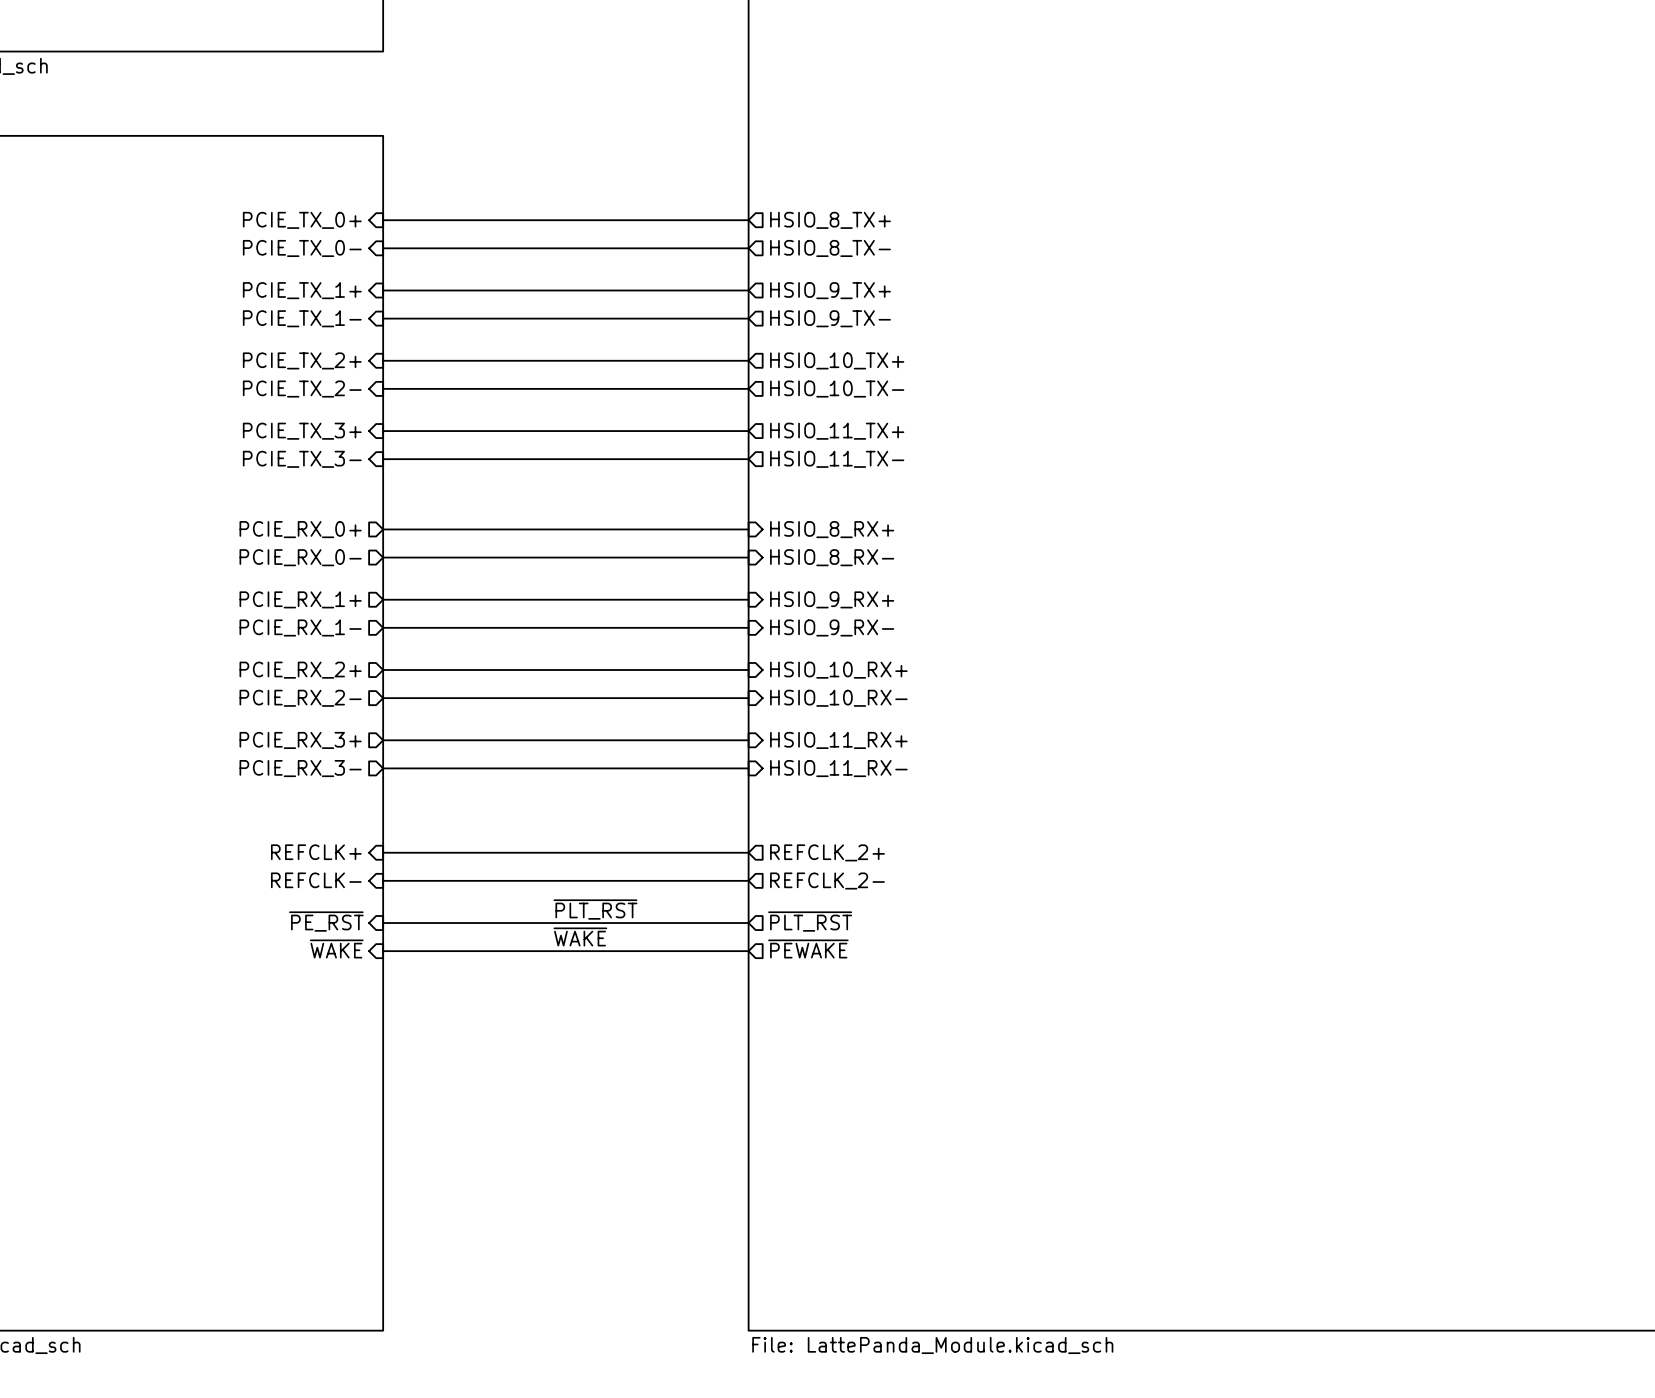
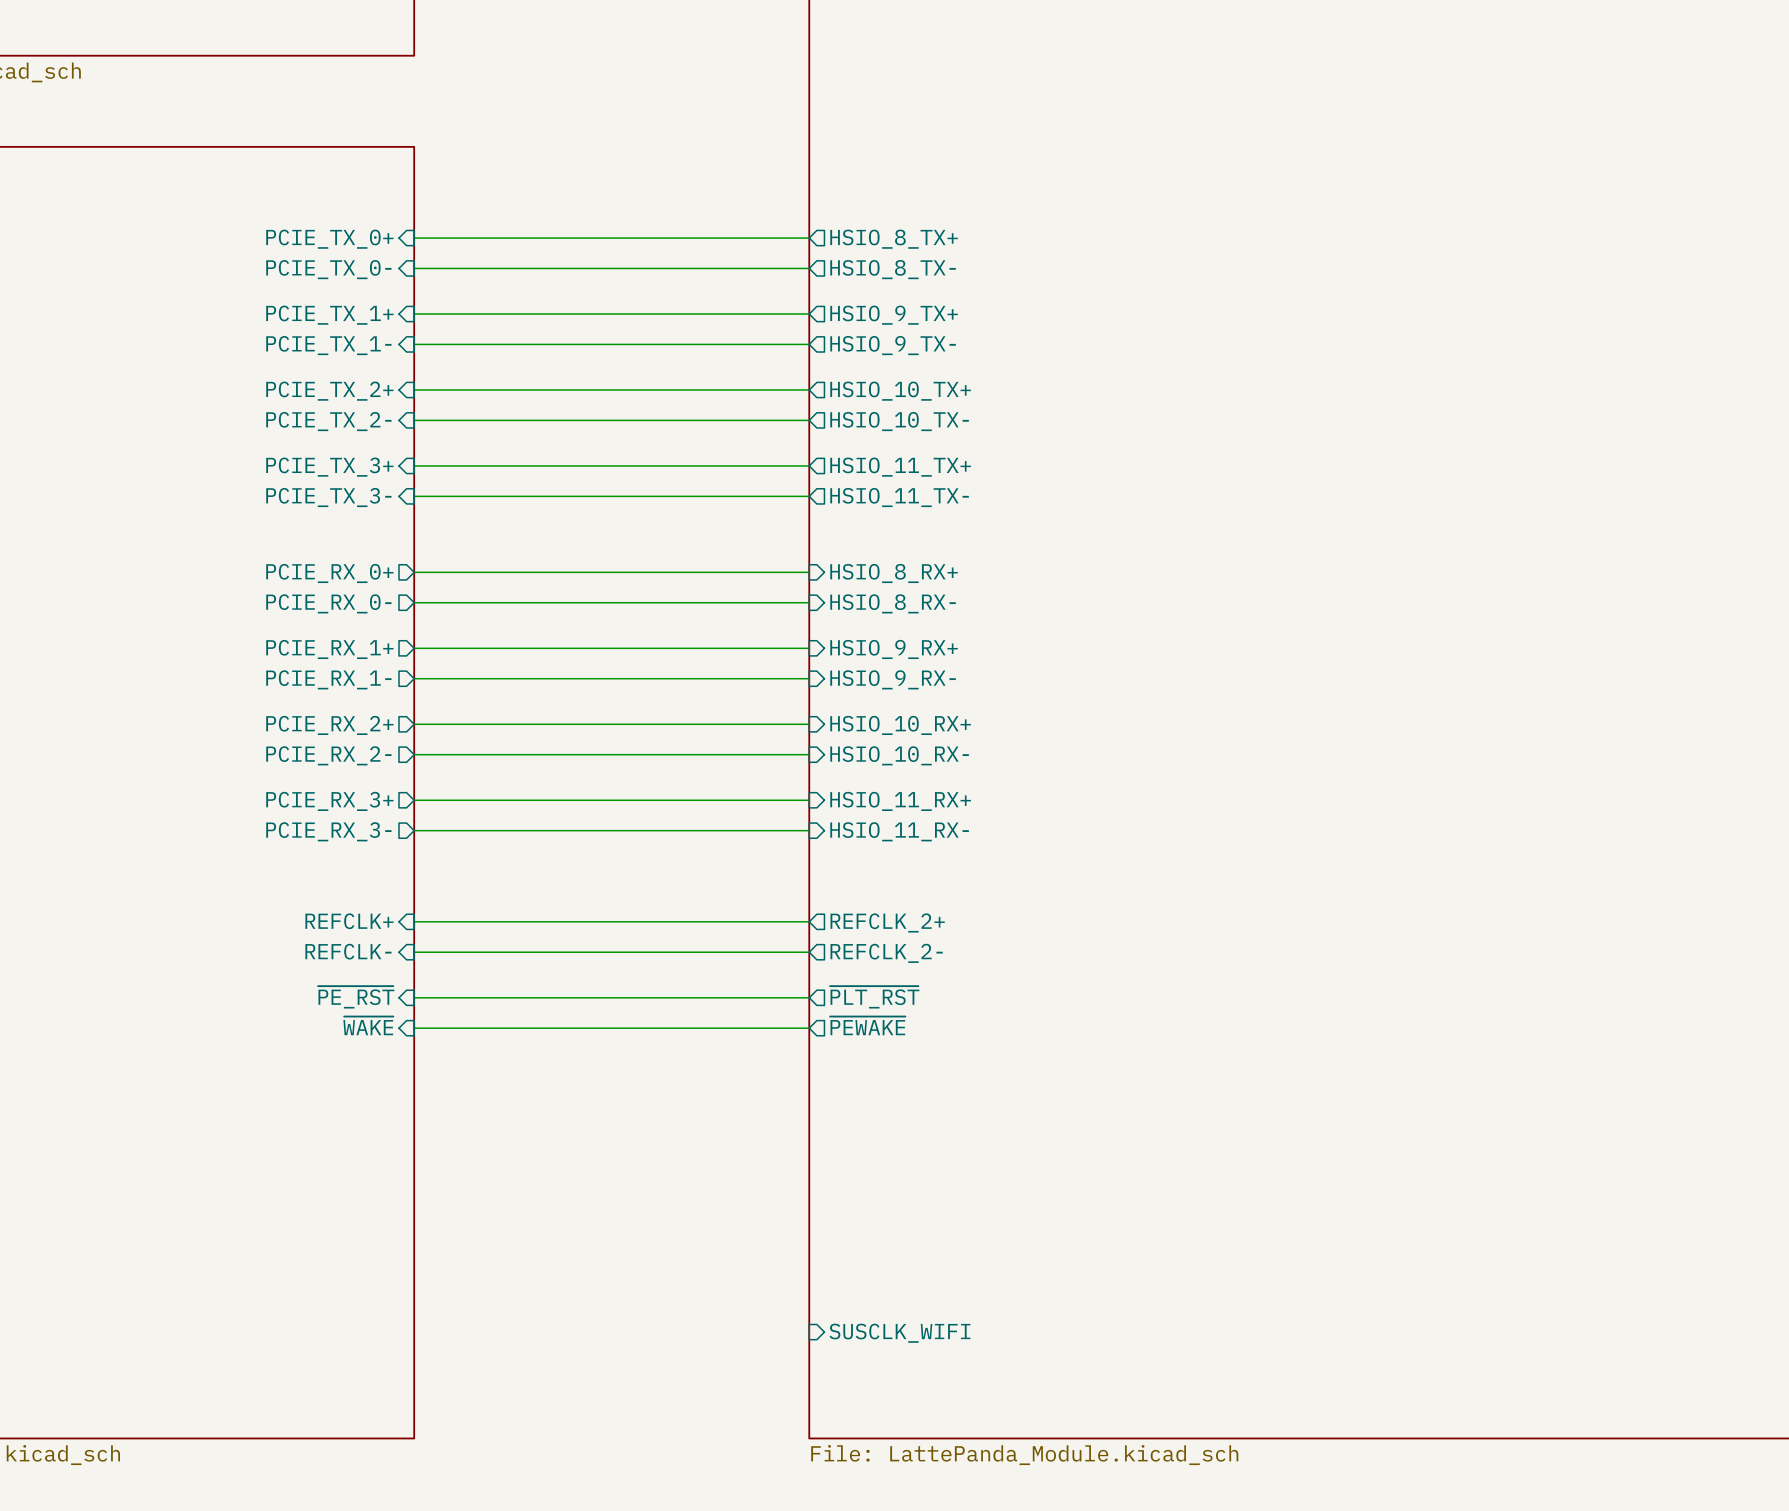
label: ~{PLT_RST} (595, 909) -> none
label: ~{WAKE} (580, 936) -> none
sheet pin: none -> SUSCLK_WIFI (899, 1333)

